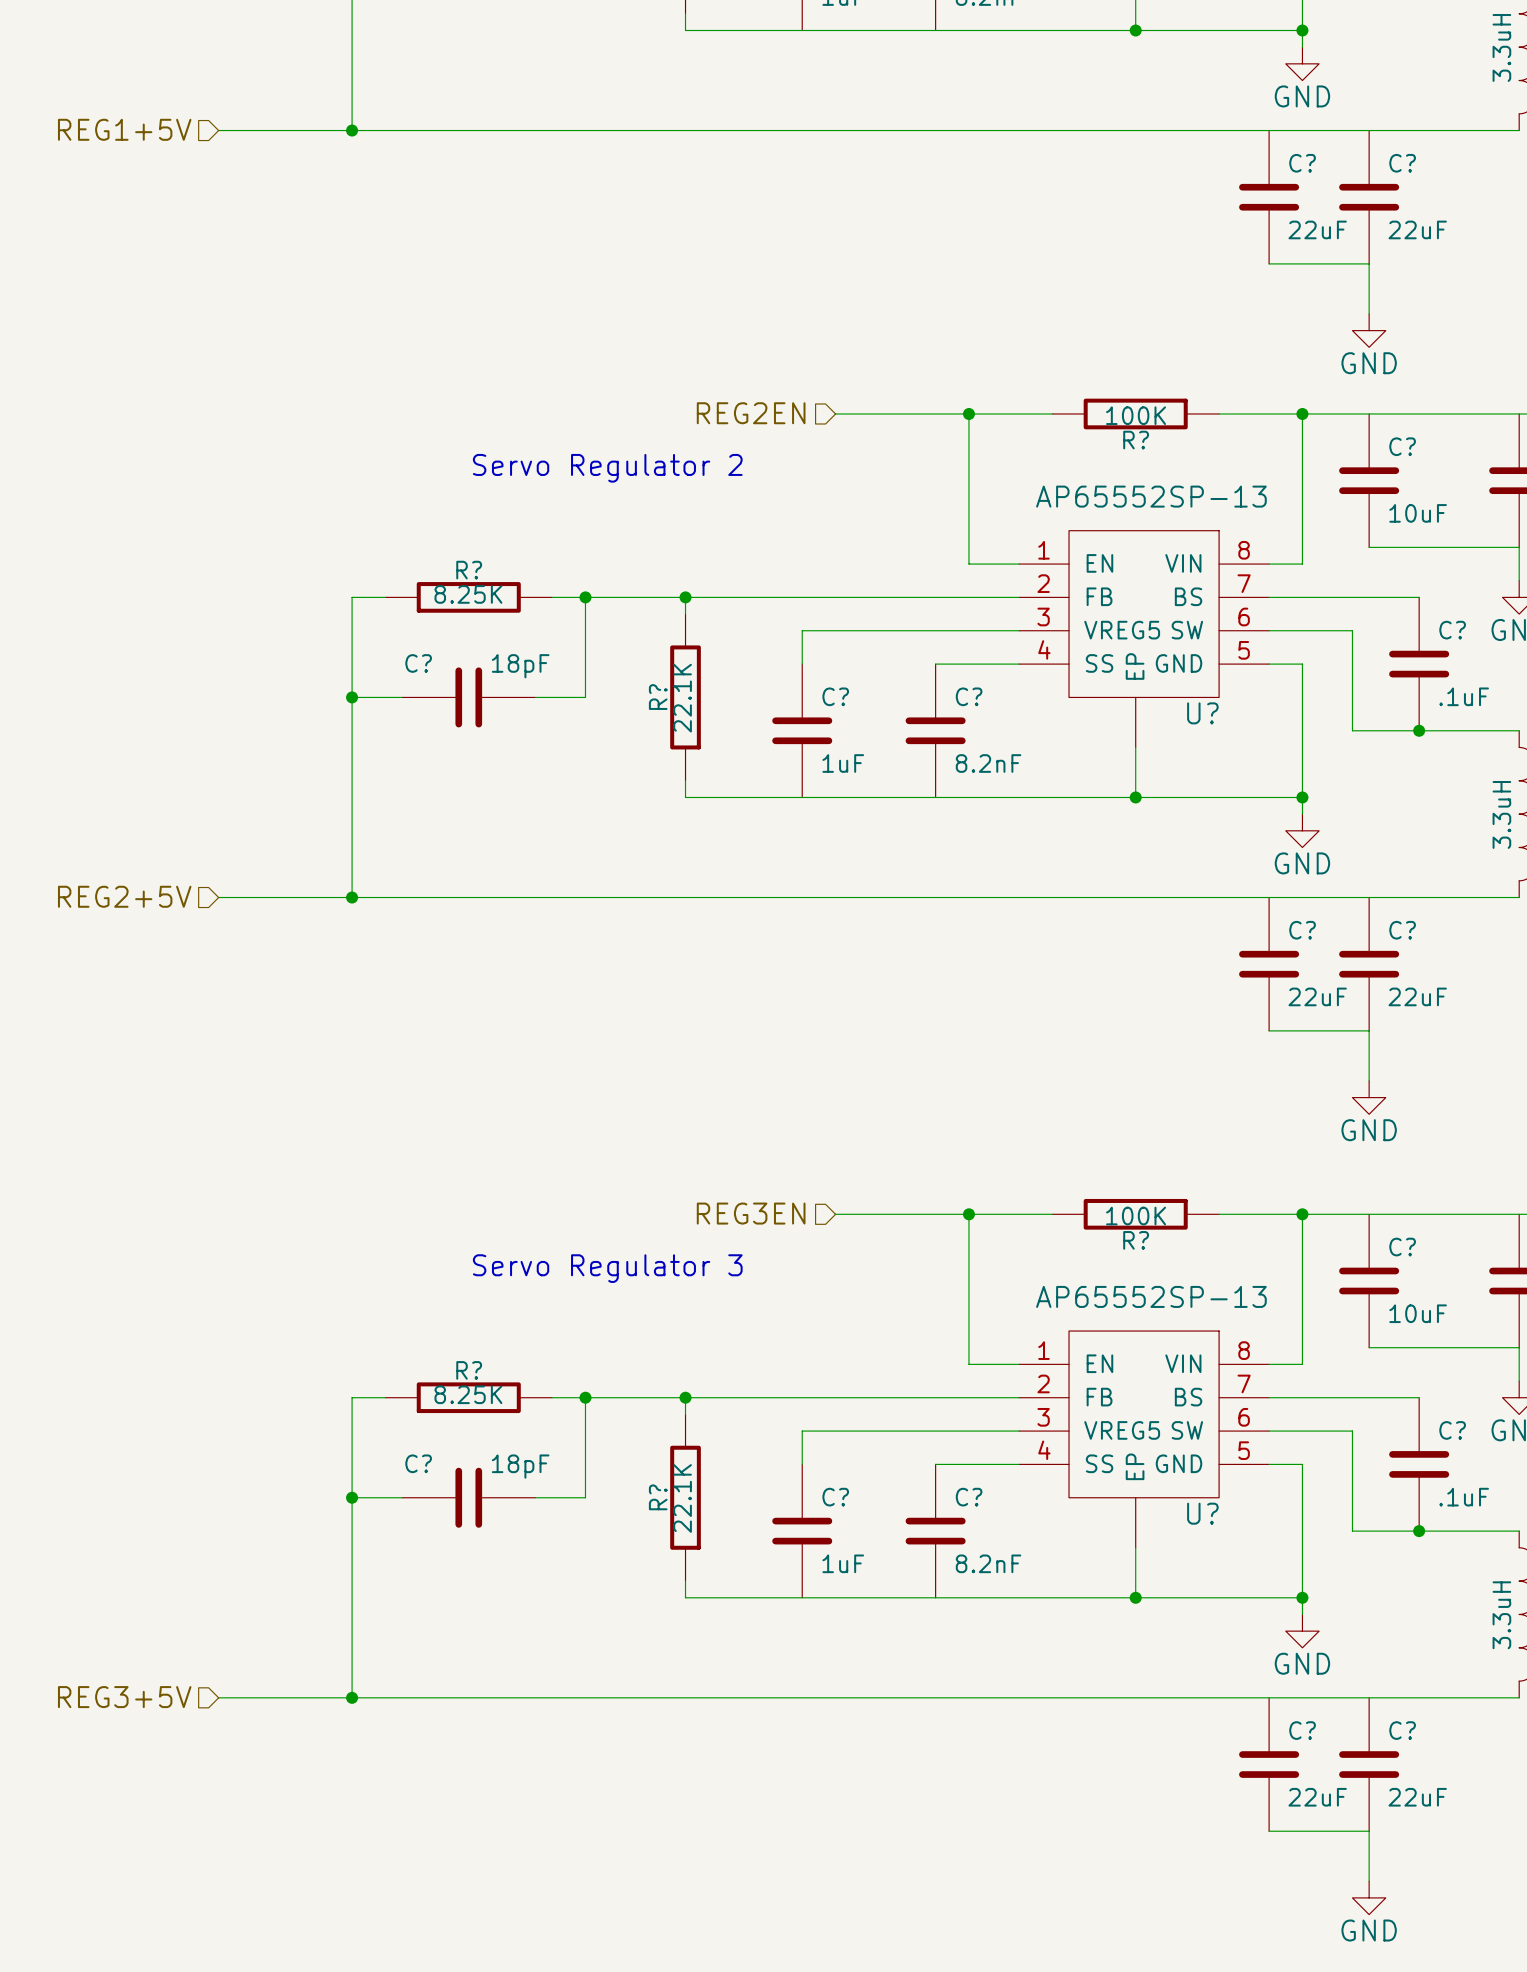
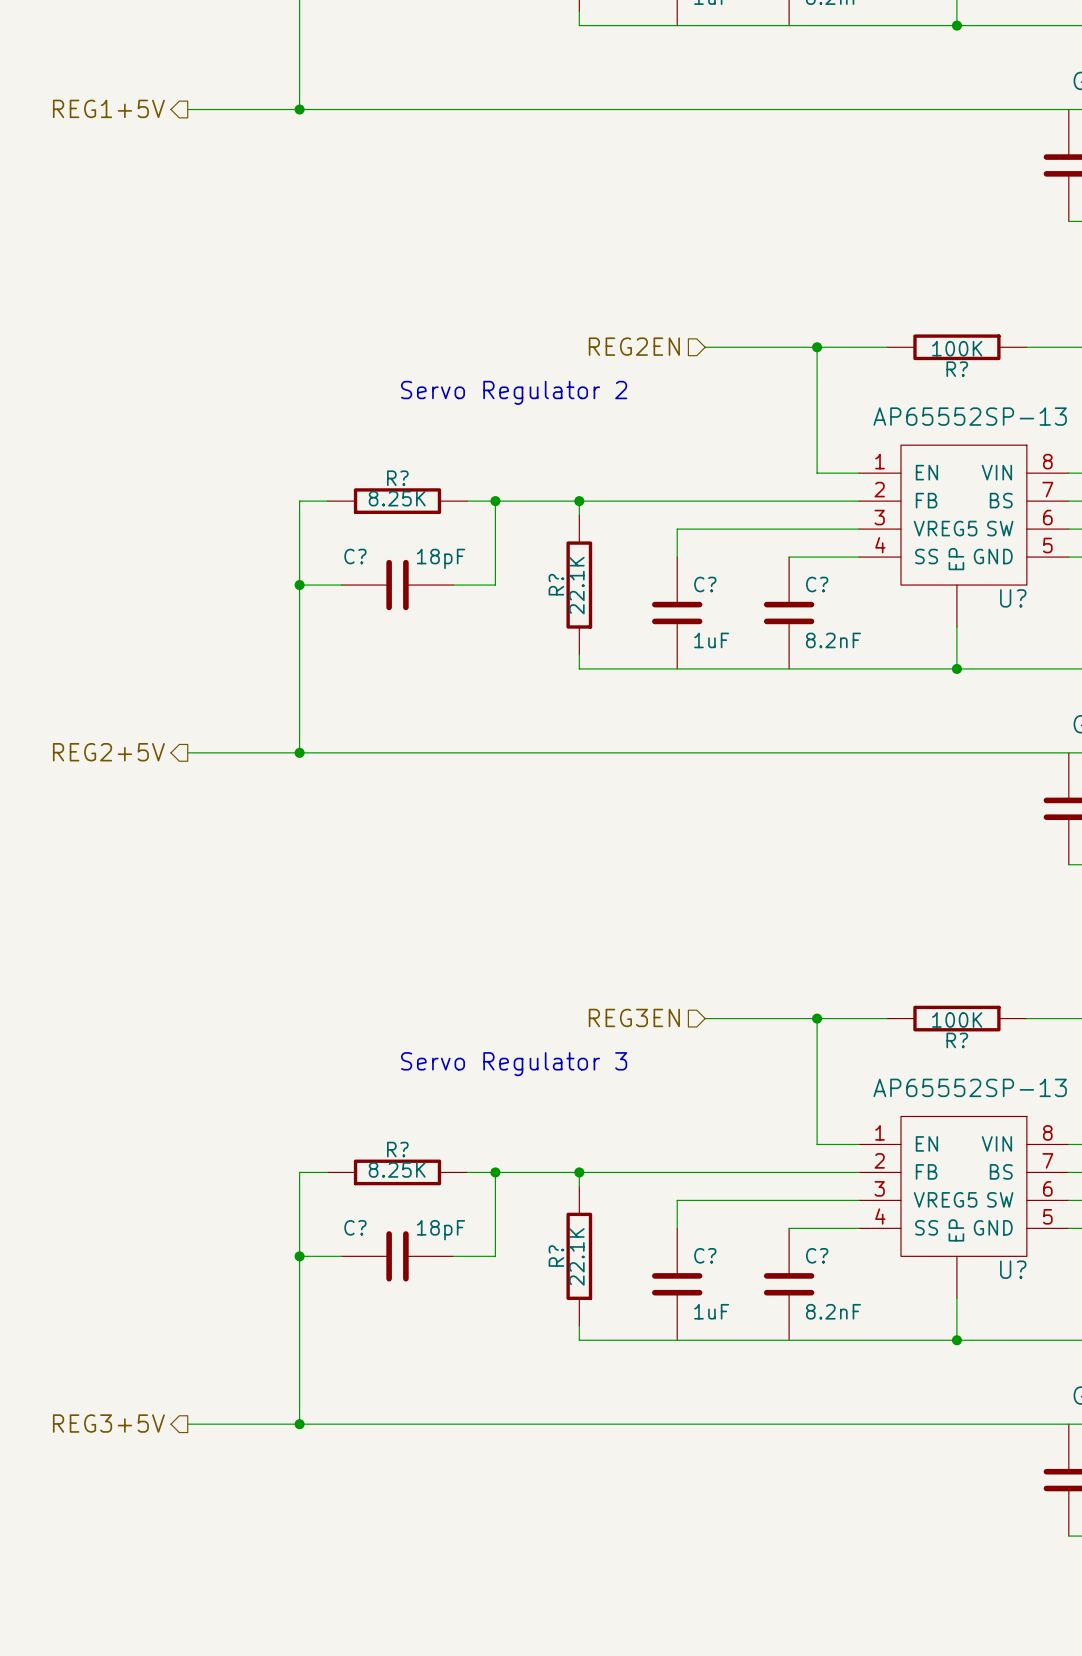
hierarchical label shape: input (124, 129) -> output (108, 108)
hierarchical label shape: input (124, 896) -> output (108, 752)
hierarchical label shape: input (124, 1697) -> output (108, 1423)

